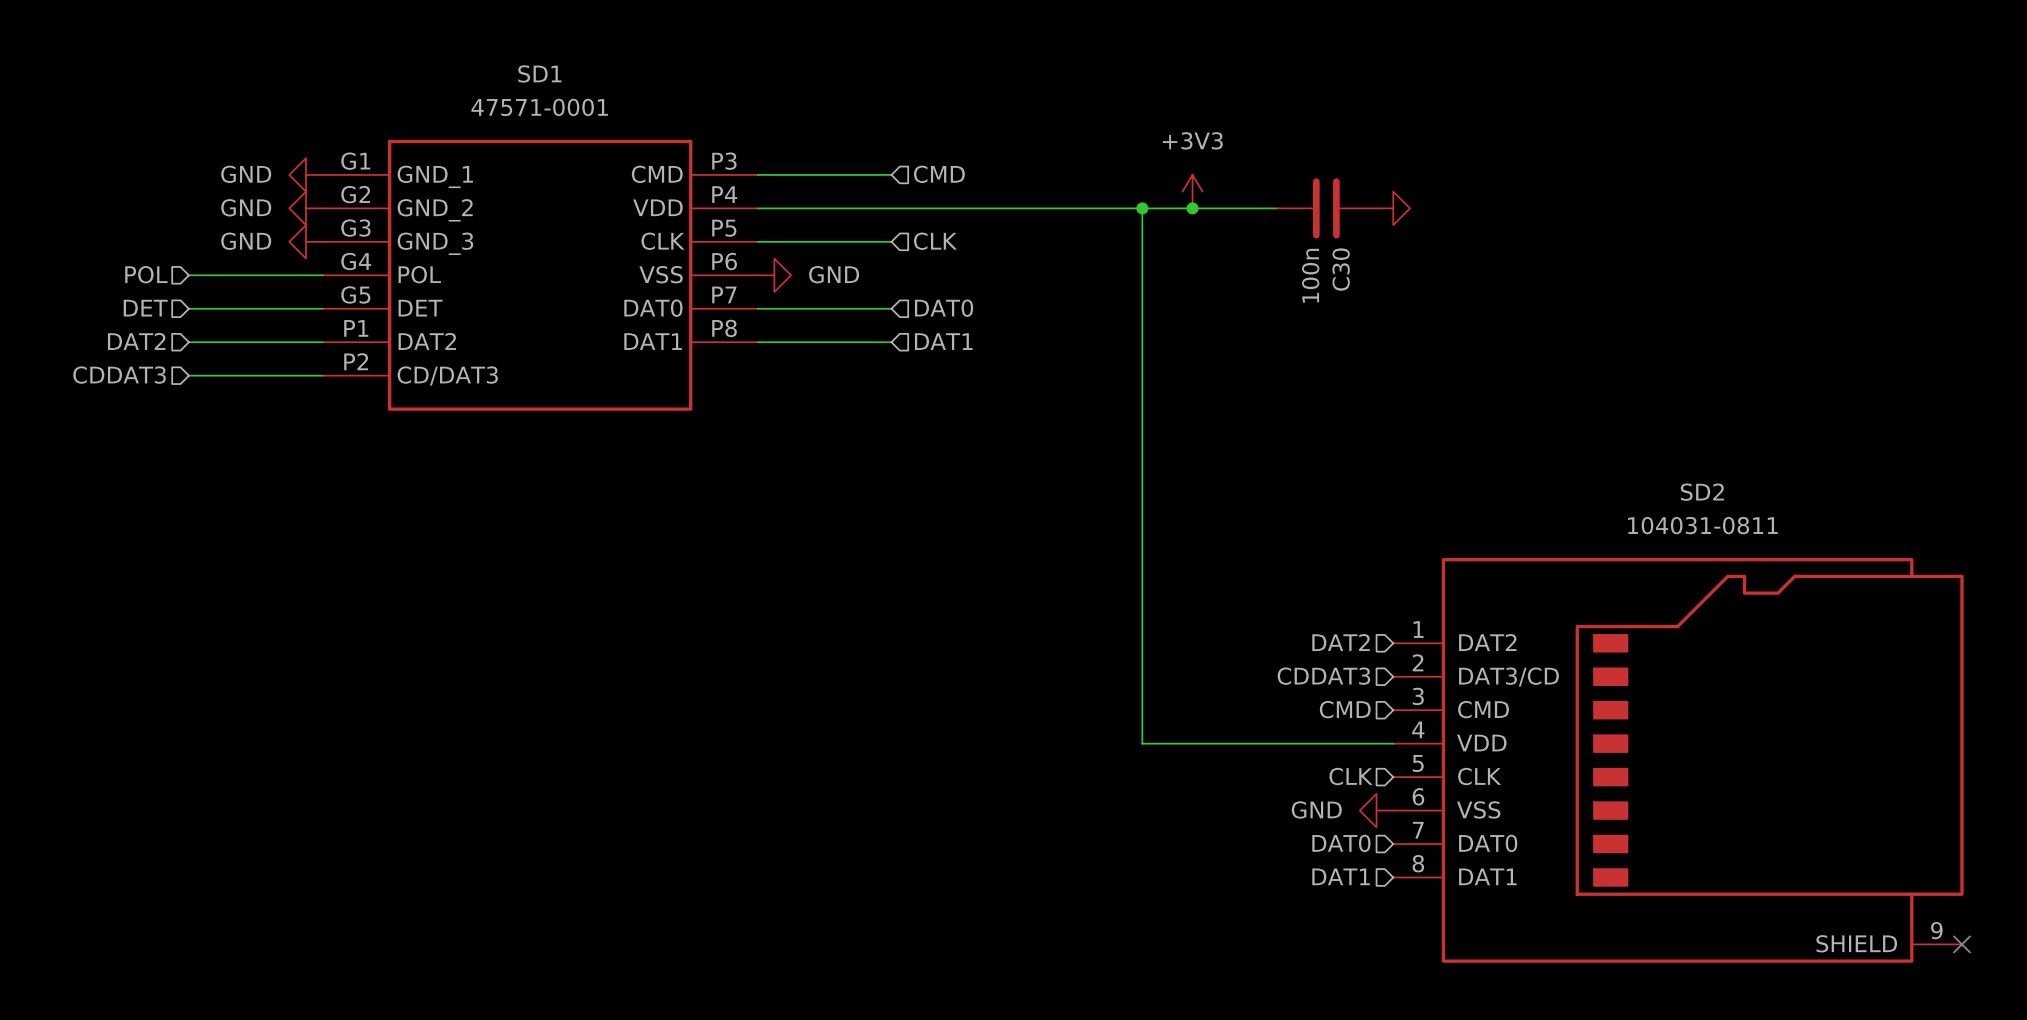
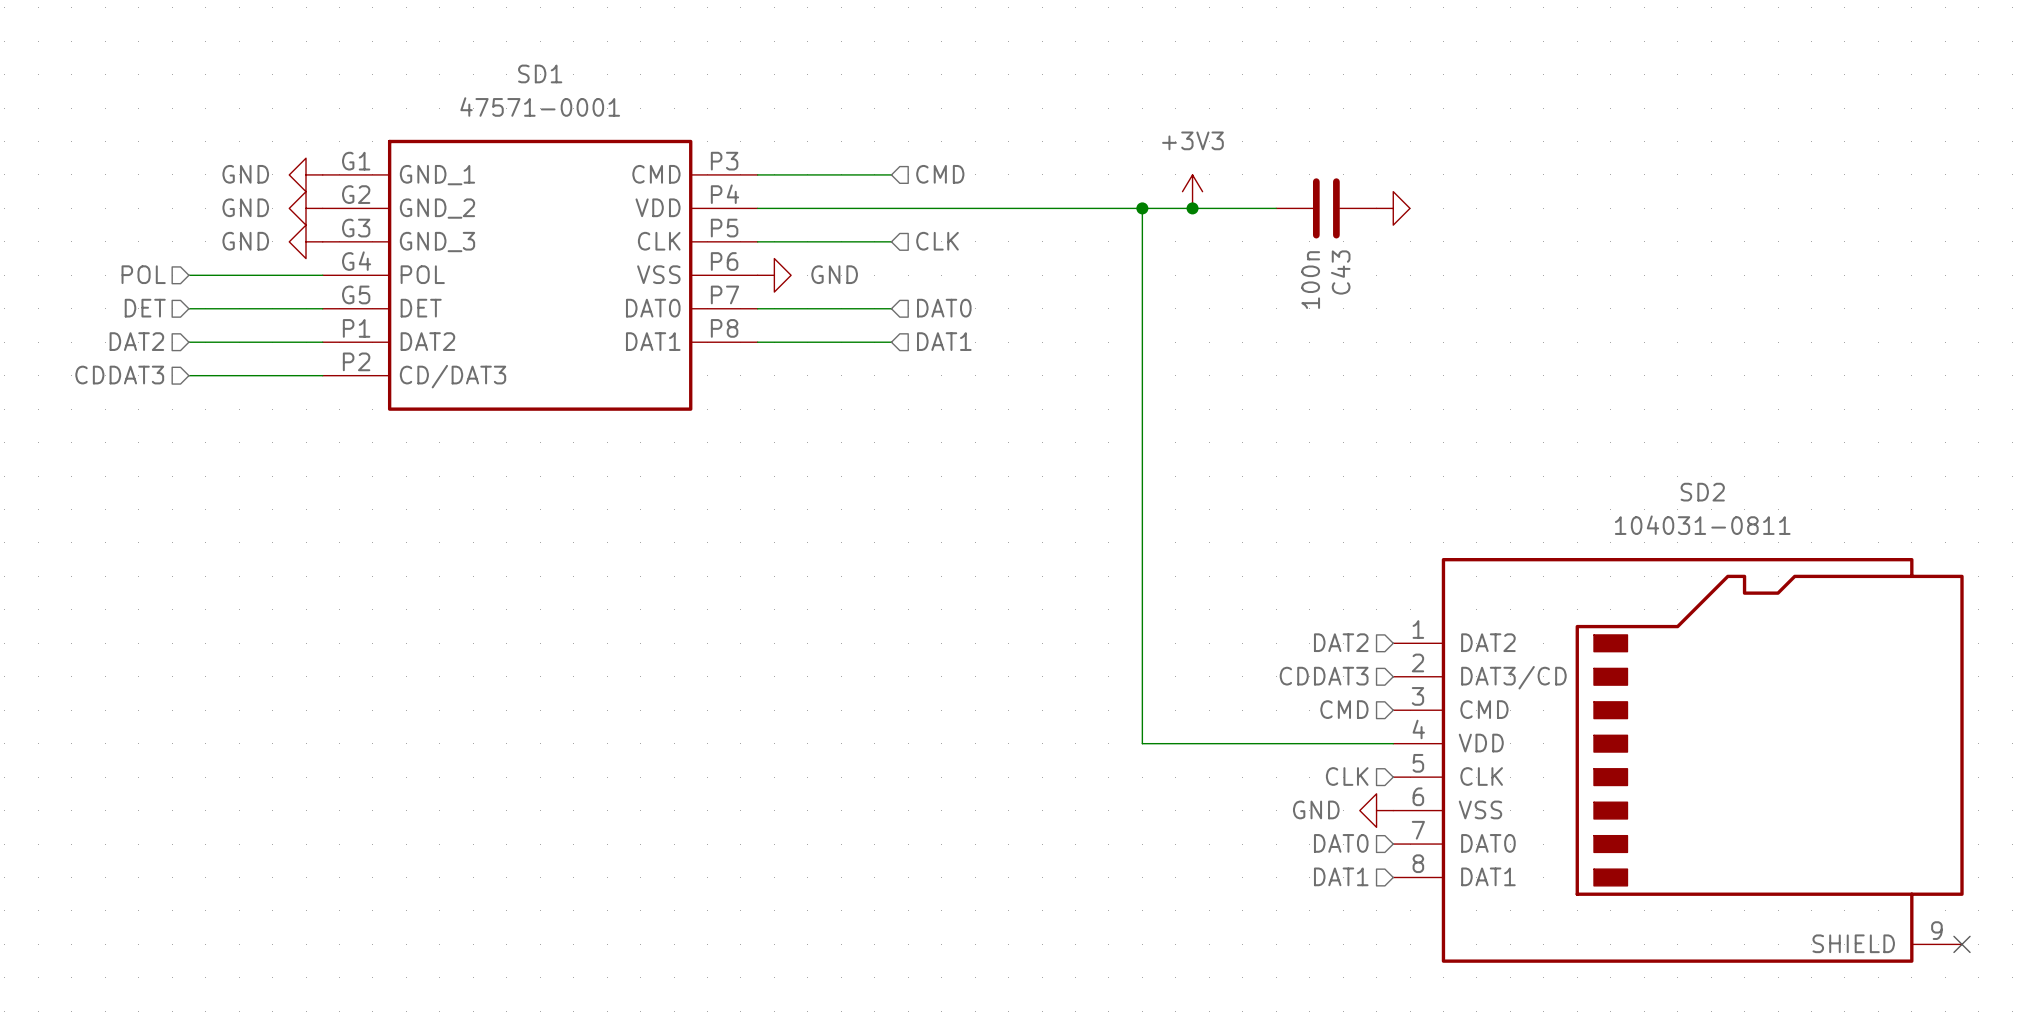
C30 name: C30 (1341, 269) -> C43 (1340, 272)

